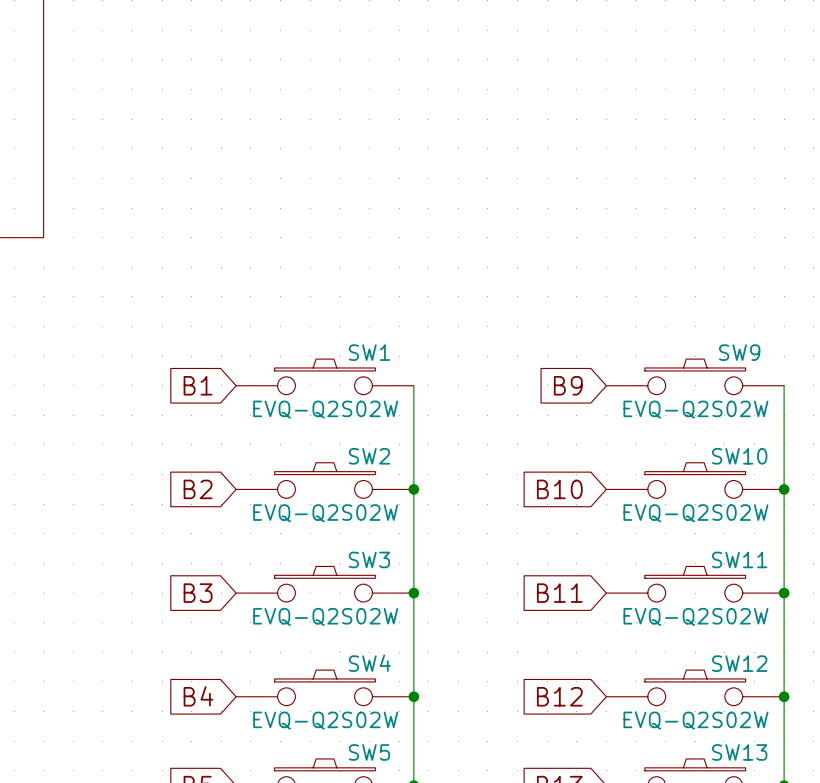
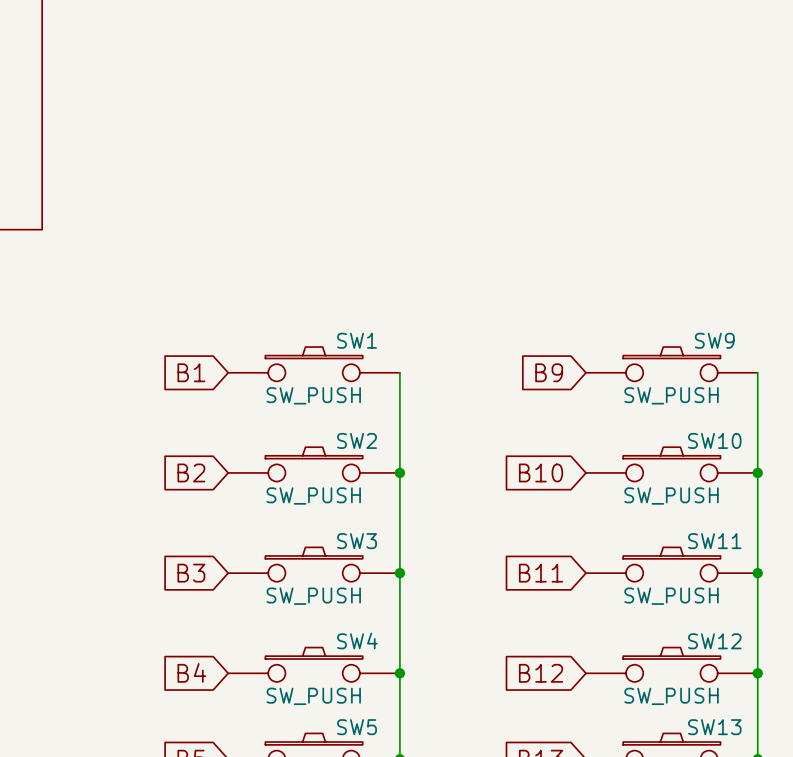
SW1 value: EVQ-Q2S02W (325, 409) -> SW_PUSH (313, 395)
SW9 value: EVQ-Q2S02W (695, 409) -> SW_PUSH (671, 395)
SW2 value: EVQ-Q2S02W (325, 513) -> SW_PUSH (313, 496)
SW10 value: EVQ-Q2S02W (695, 513) -> SW_PUSH (671, 496)
SW3 value: EVQ-Q2S02W (325, 616) -> SW_PUSH (313, 596)
SW11 value: EVQ-Q2S02W (695, 616) -> SW_PUSH (671, 596)
SW4 value: EVQ-Q2S02W (325, 720) -> SW_PUSH (313, 696)
SW12 value: EVQ-Q2S02W (695, 720) -> SW_PUSH (671, 696)

